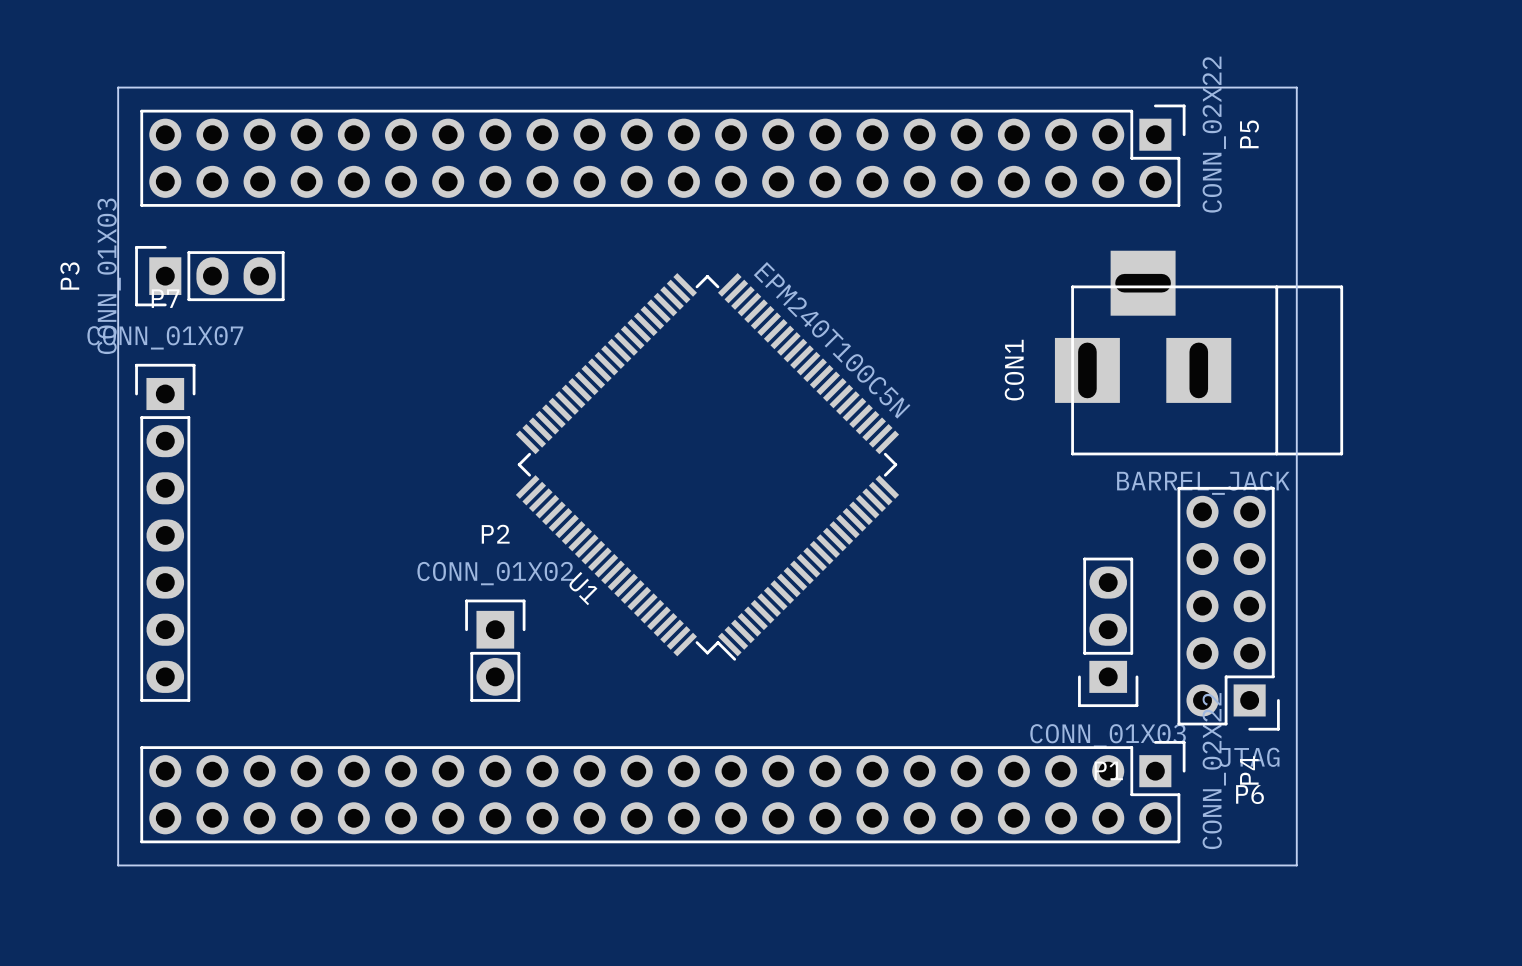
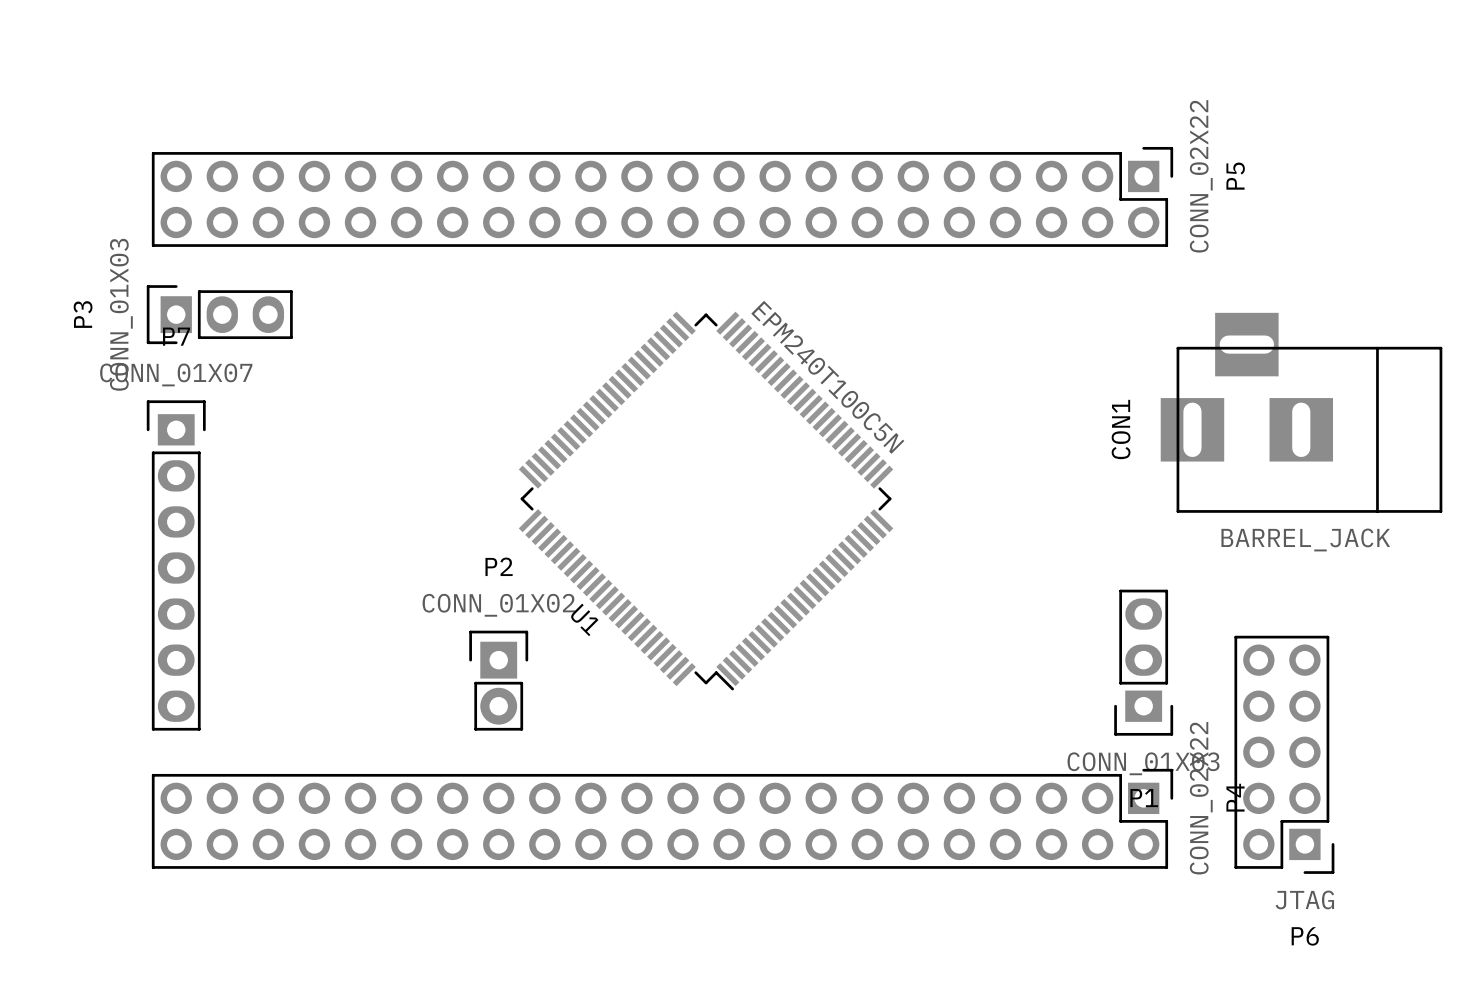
board edge: (118, 87) (118, 865) (1296, 865) (1296, 87) (118, 87) -> none
CON1 position: (1199, 353) -> (1301, 412)
P6 position: (1228, 608) -> (1284, 754)
P1 position: (1108, 632) -> (1143, 662)

